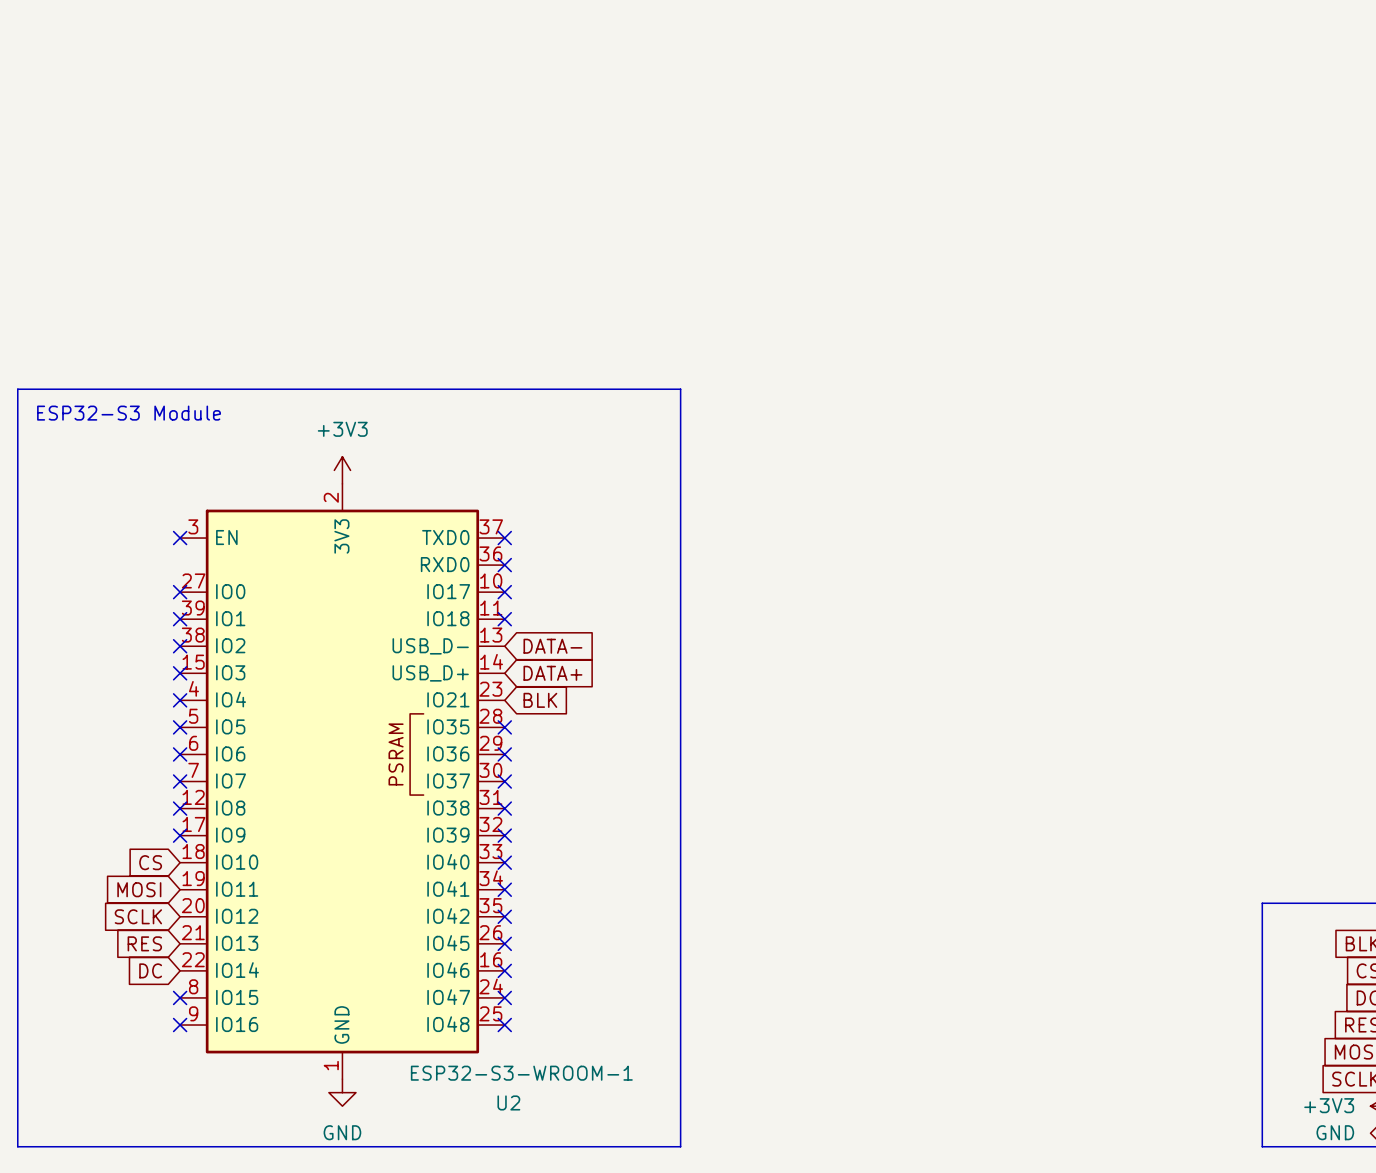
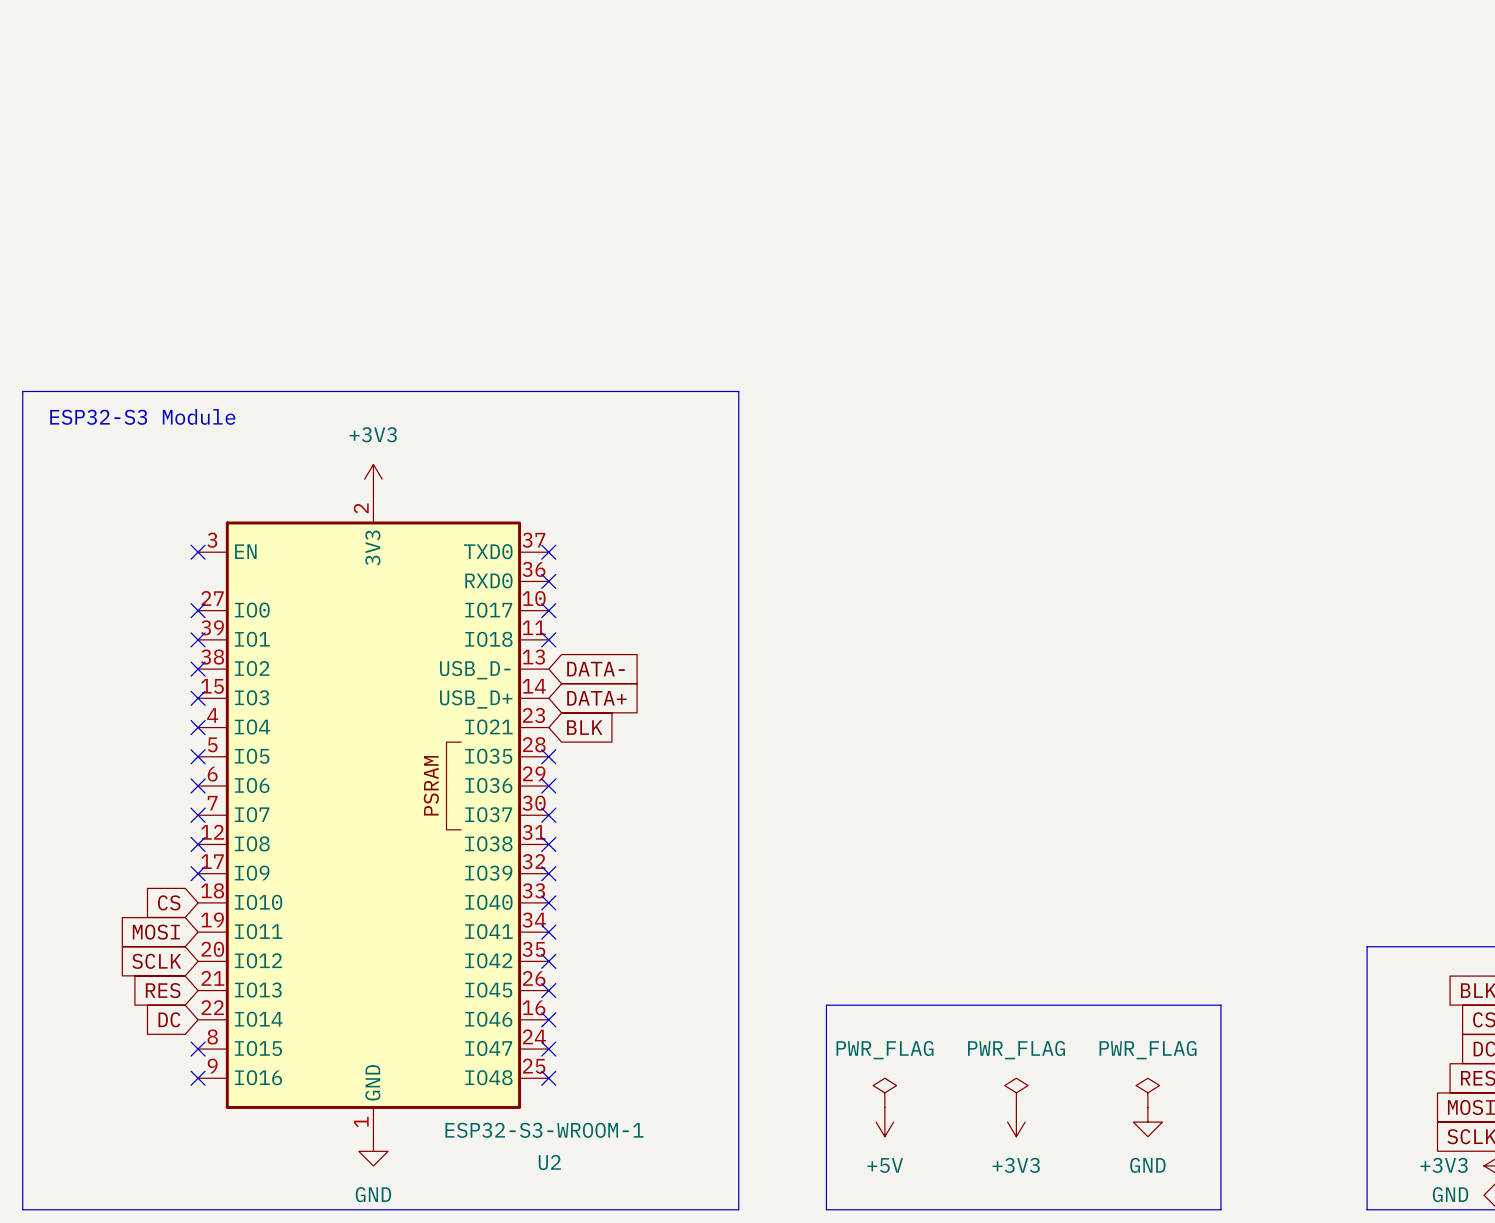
line: none -> (826, 1005) (1220, 1005) (1220, 1209) (826, 1209) (826, 1005)
power symbol: none -> PWR_FLAG (884, 1092)
power symbol: none -> PWR_FLAG (1016, 1092)
power symbol: none -> PWR_FLAG (1147, 1092)
power symbol: none -> +5V (884, 1122)
power symbol: none -> +3V3 (1016, 1122)
power symbol: none -> GND (1147, 1122)

